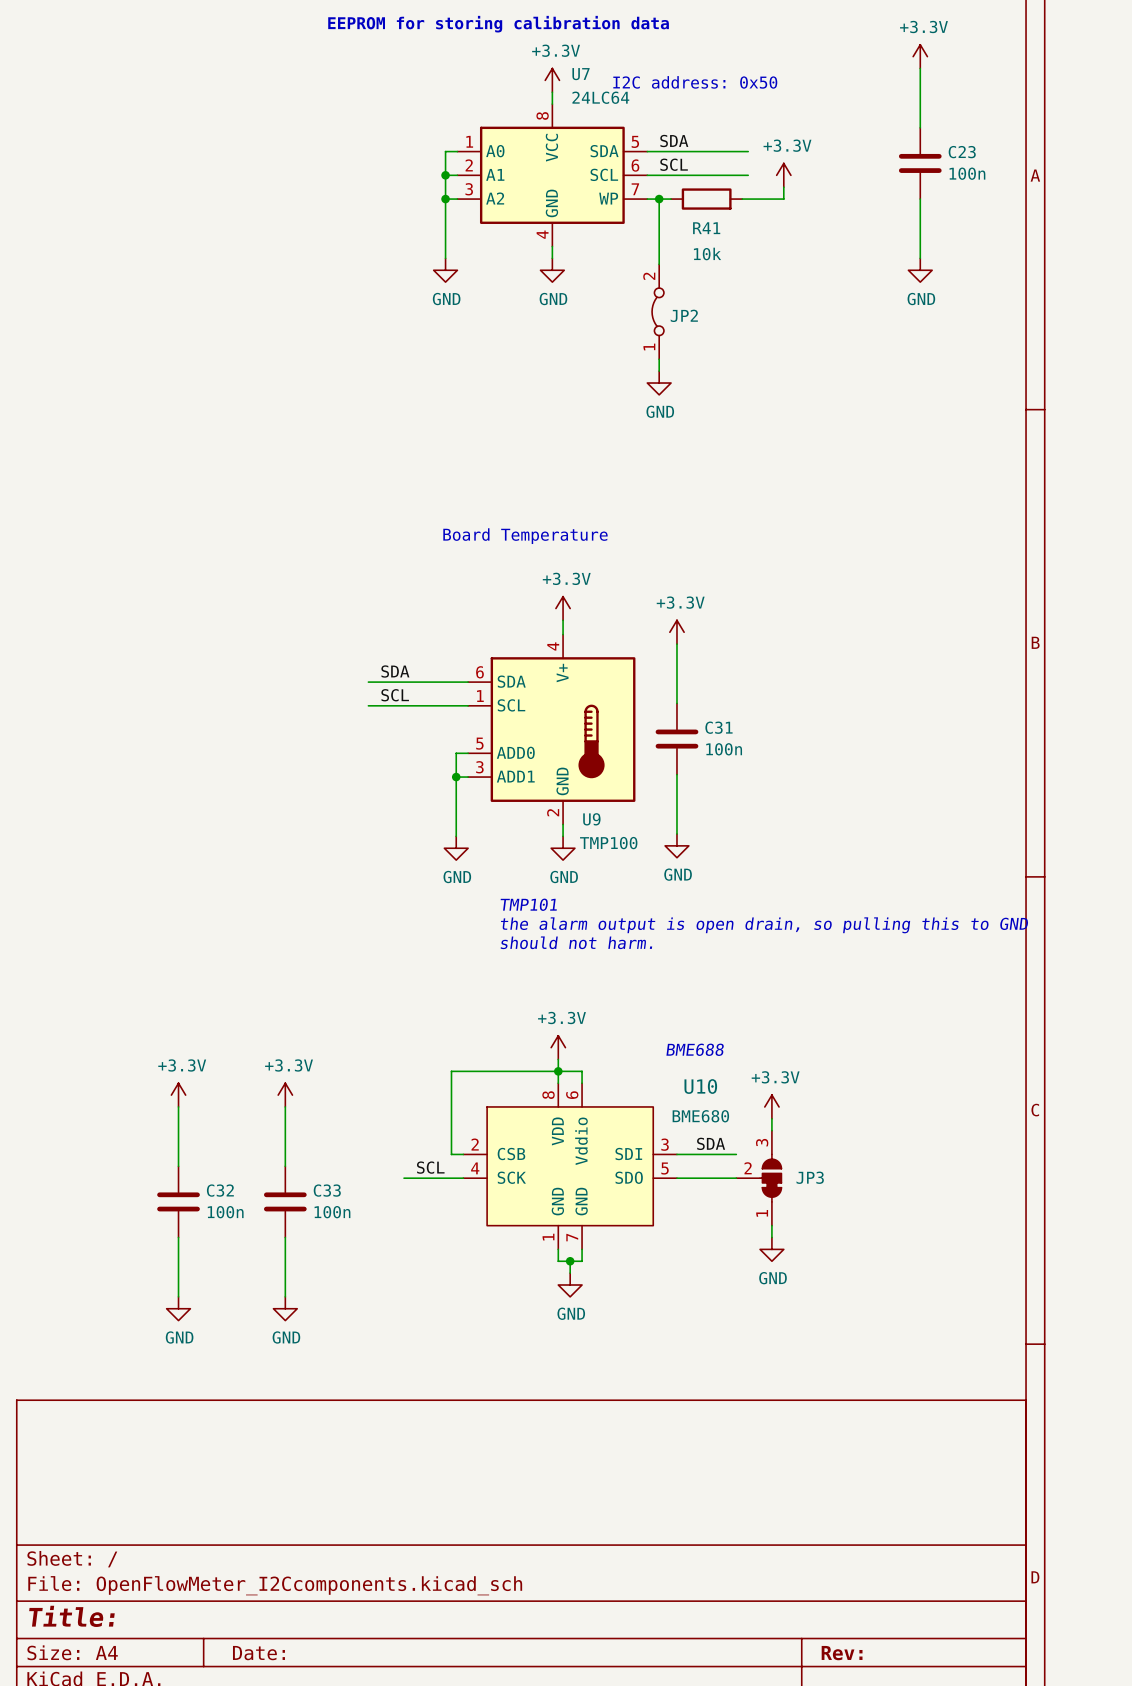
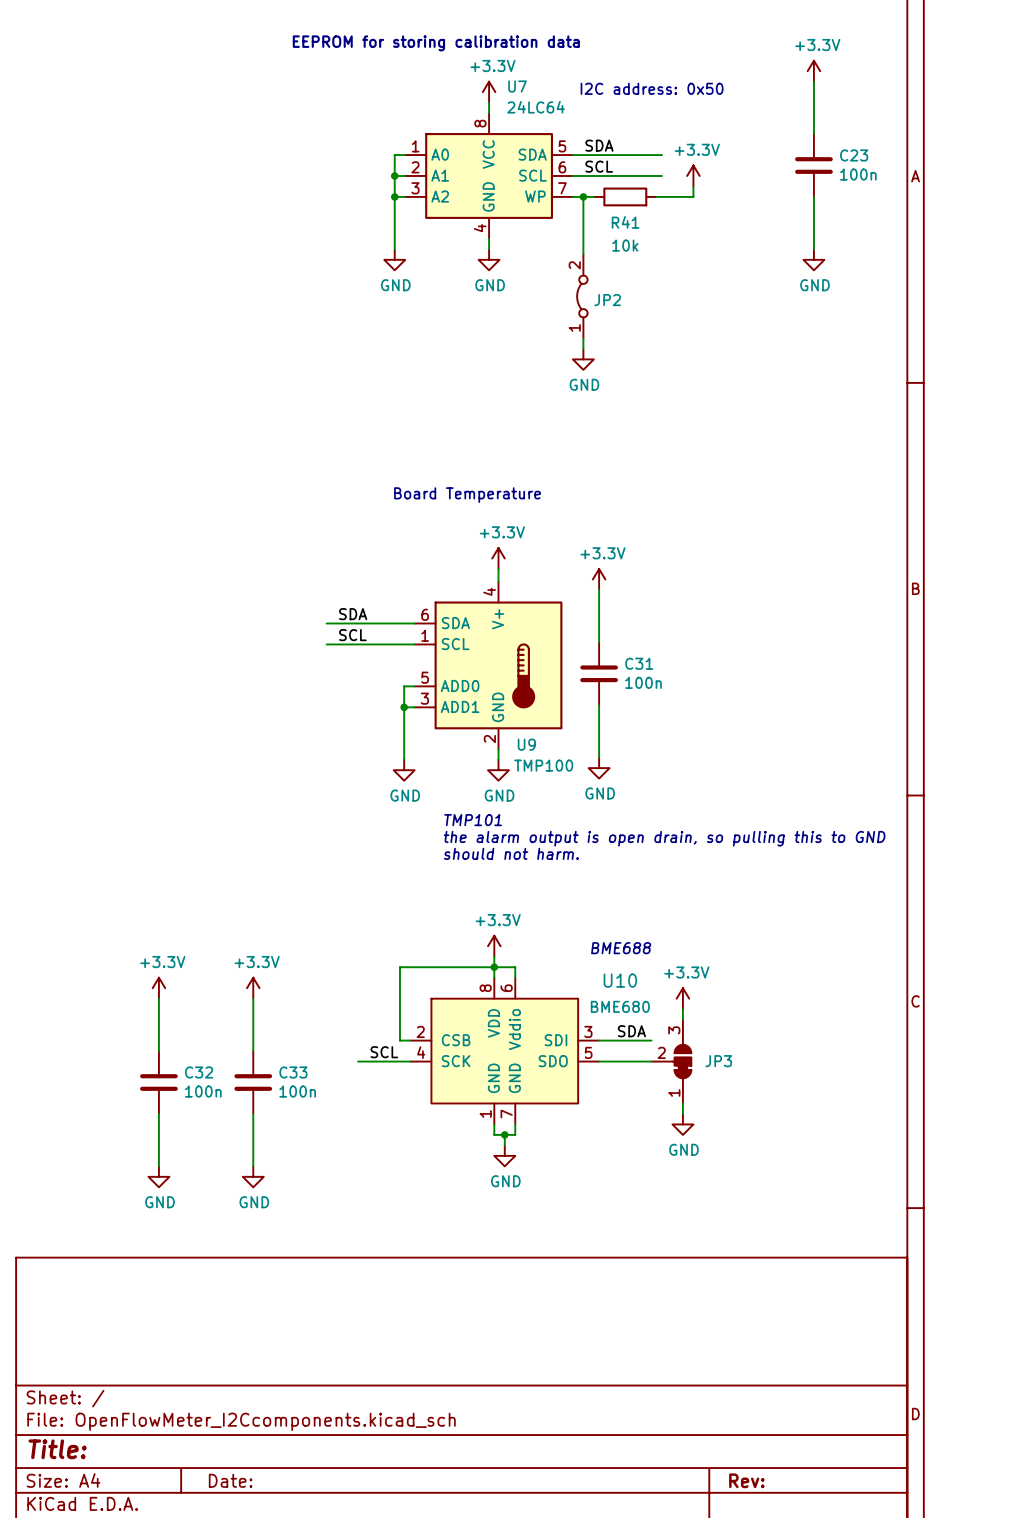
text position: I2C address: 0x50 (695, 82) -> I2C address: 0x50 (652, 88)

